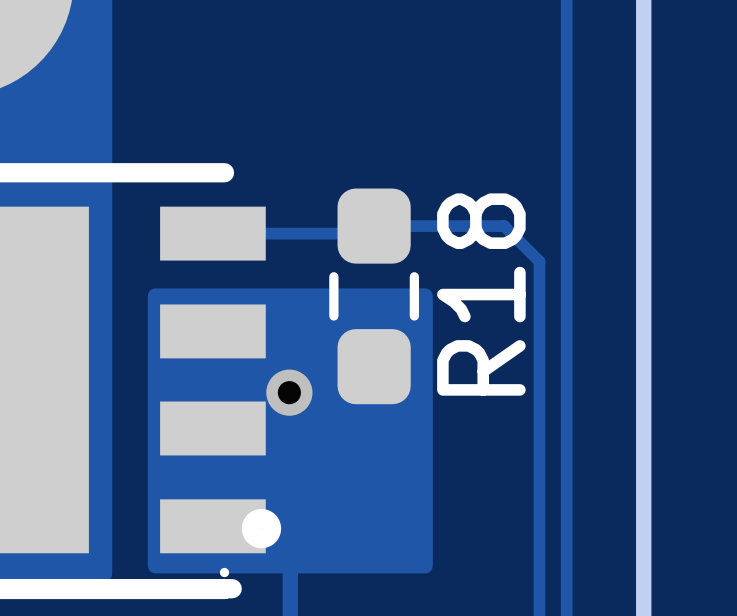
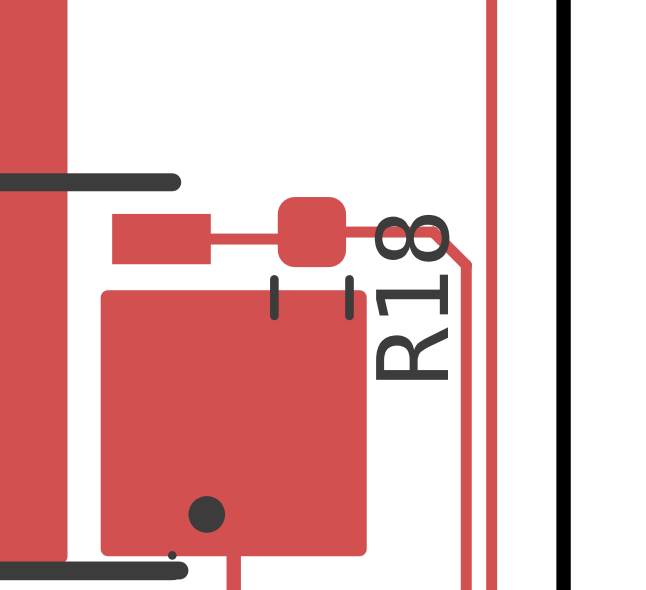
via: (289, 392) -> none

